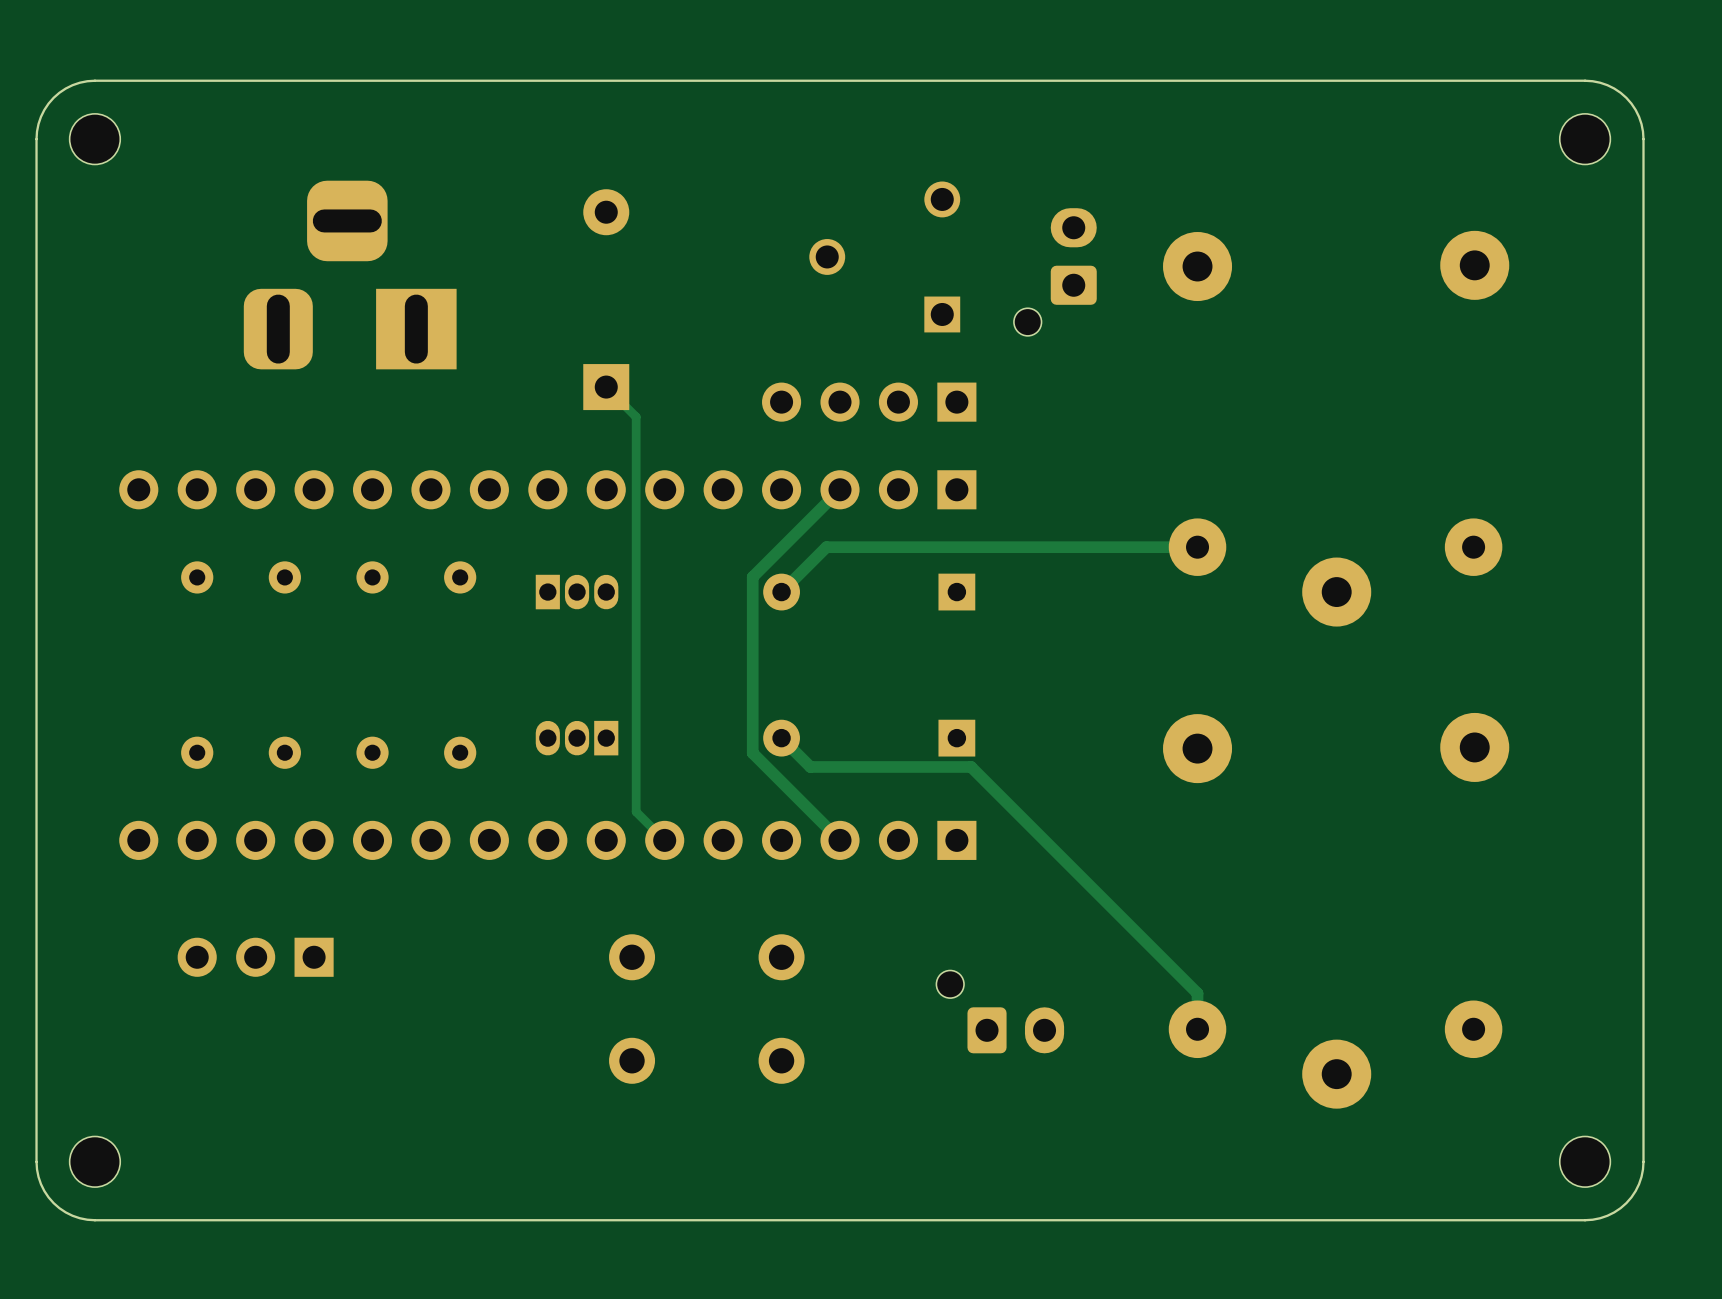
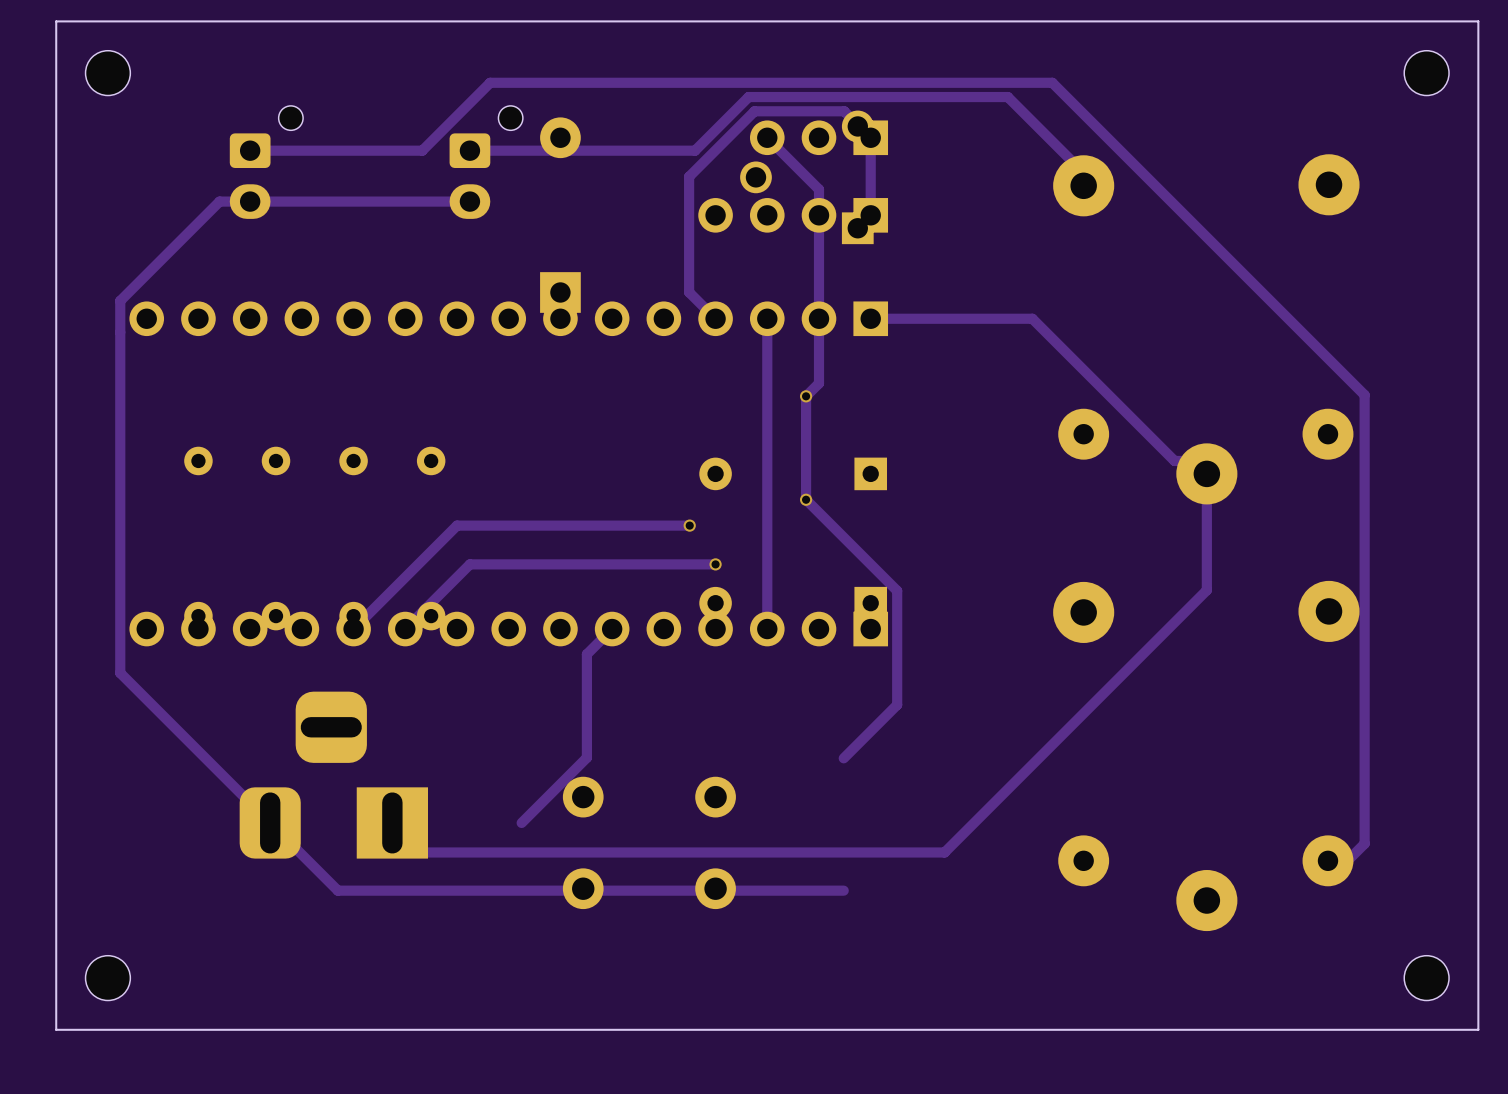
board edge: (94, 80) (72, 85) (53, 97) (40, 116) (36, 139) -> (107, 21) (56, 21) (56, 73)
board edge: (1585, 80) (1607, 85) (1626, 97) (1639, 116) (1643, 139) -> (1426, 21) (1478, 21) (1478, 73)
track: none -> (767, 137) (819, 189) (819, 383) (806, 396) (806, 499) (897, 590) (897, 704) (843, 758)
part: none -> (819, 137)
track: none -> (250, 150) (422, 150) (490, 82) (1052, 82) (1364, 395) (1364, 843) (1330, 878)
track: none -> (469, 150) (695, 150) (748, 97) (1007, 97) (1083, 172)
part: none -> (266, 162)
part: none -> (486, 162)
part: (1055, 272) -> none
part: (350, 275) -> none
track: none -> (469, 201) (219, 201) (120, 300) (120, 673) (337, 890) (843, 890)
track: none -> (870, 215) (870, 137) (844, 111) (754, 111) (689, 176) (689, 292) (715, 318)
track: (606, 387) (636, 416) (636, 811) (664, 840) -> none
part position: (869, 402) -> (793, 215)
track: none -> (767, 318) (767, 629)
track: none -> (870, 318) (1032, 318) (1174, 460) (1206, 460) (1206, 590) (944, 852) (421, 852) (392, 822)
part position: (547, 489) -> (508, 318)
track: (840, 489) (752, 577) (752, 753) (840, 840) -> none
via: none -> (806, 396)
track: (1197, 547) (826, 547) (781, 592) -> none
part: (577, 592) -> none
via: none -> (806, 499)
track: none -> (689, 525) (457, 525) (353, 629)
via: none -> (689, 525)
track: none -> (715, 564) (469, 564) (405, 629)
via: none -> (715, 564)
part: (577, 738) -> none
track: (781, 738) (810, 766) (971, 766) (1197, 993) (1197, 1029) -> none
track: none -> (612, 629) (586, 654) (586, 757) (521, 822)
part position: (547, 840) -> (508, 629)
part: none -> (333, 775)
part: (255, 957) -> none
part: (1000, 1011) -> none
board edge: (36, 1161) (40, 1184) (53, 1203) (72, 1215) (94, 1220) -> (56, 978) (56, 1029) (107, 1029)
board edge: (1643, 1161) (1639, 1184) (1626, 1203) (1607, 1215) (1585, 1220) -> (1478, 978) (1478, 1029) (1426, 1029)

